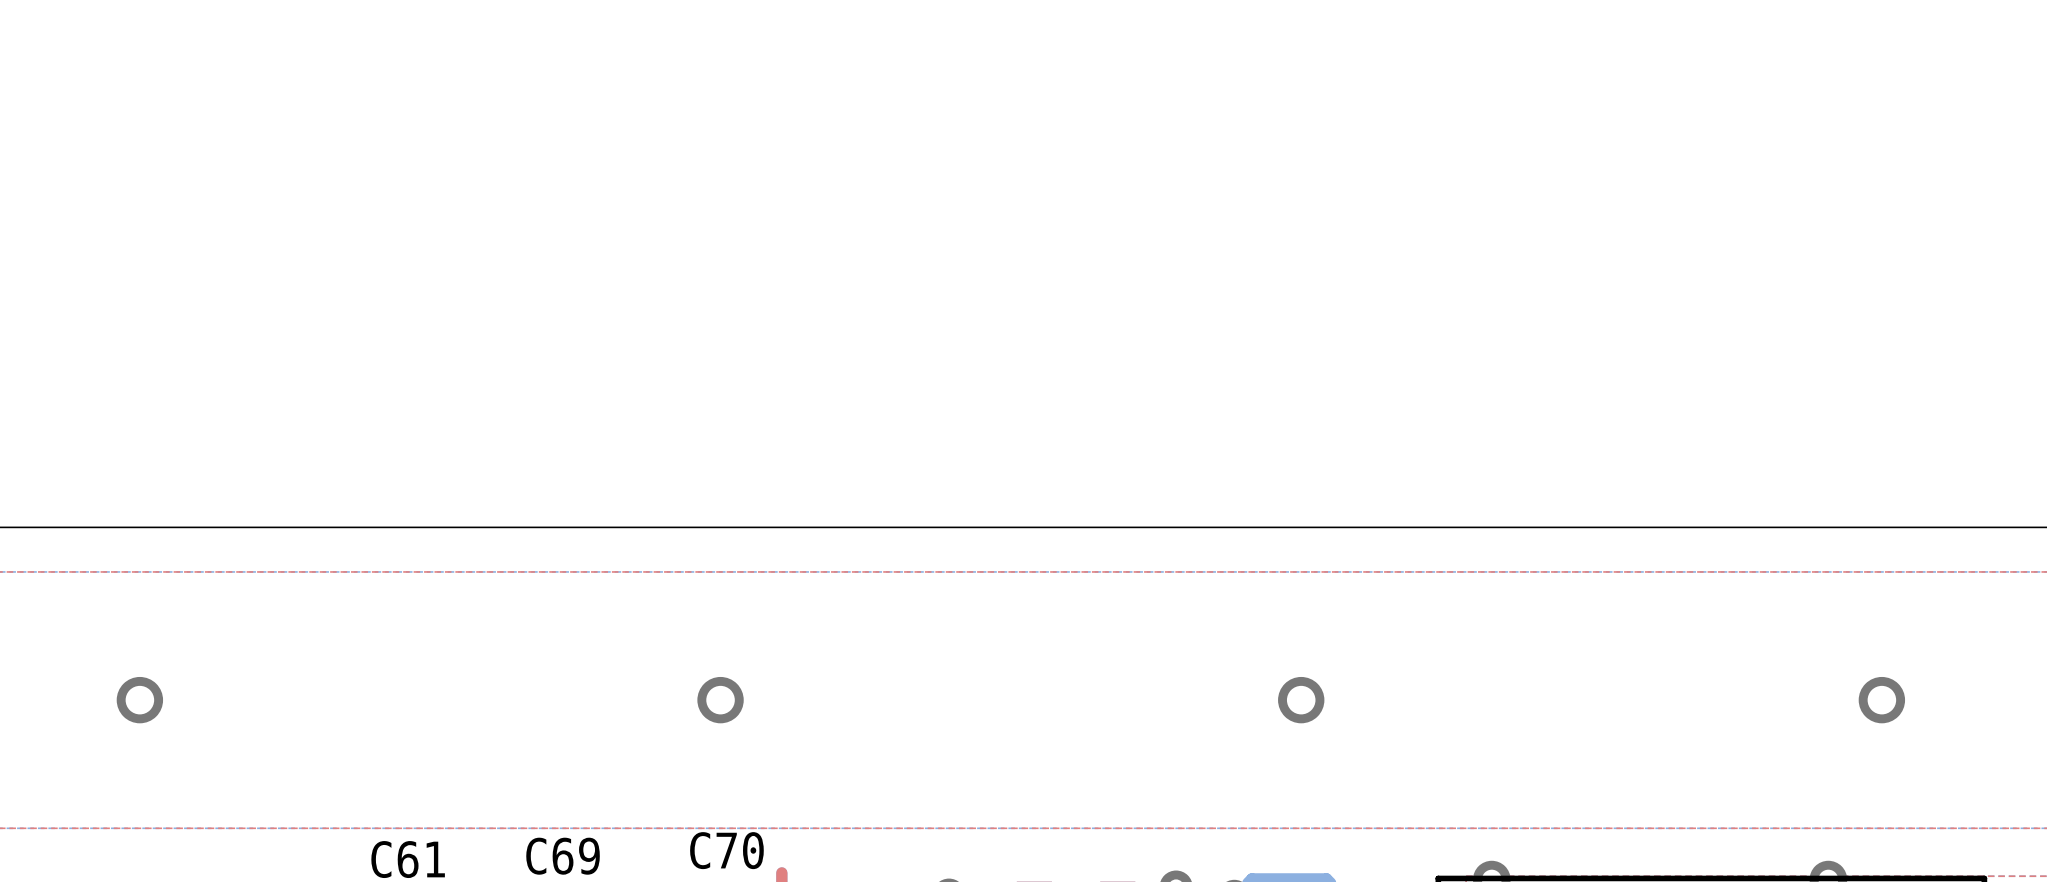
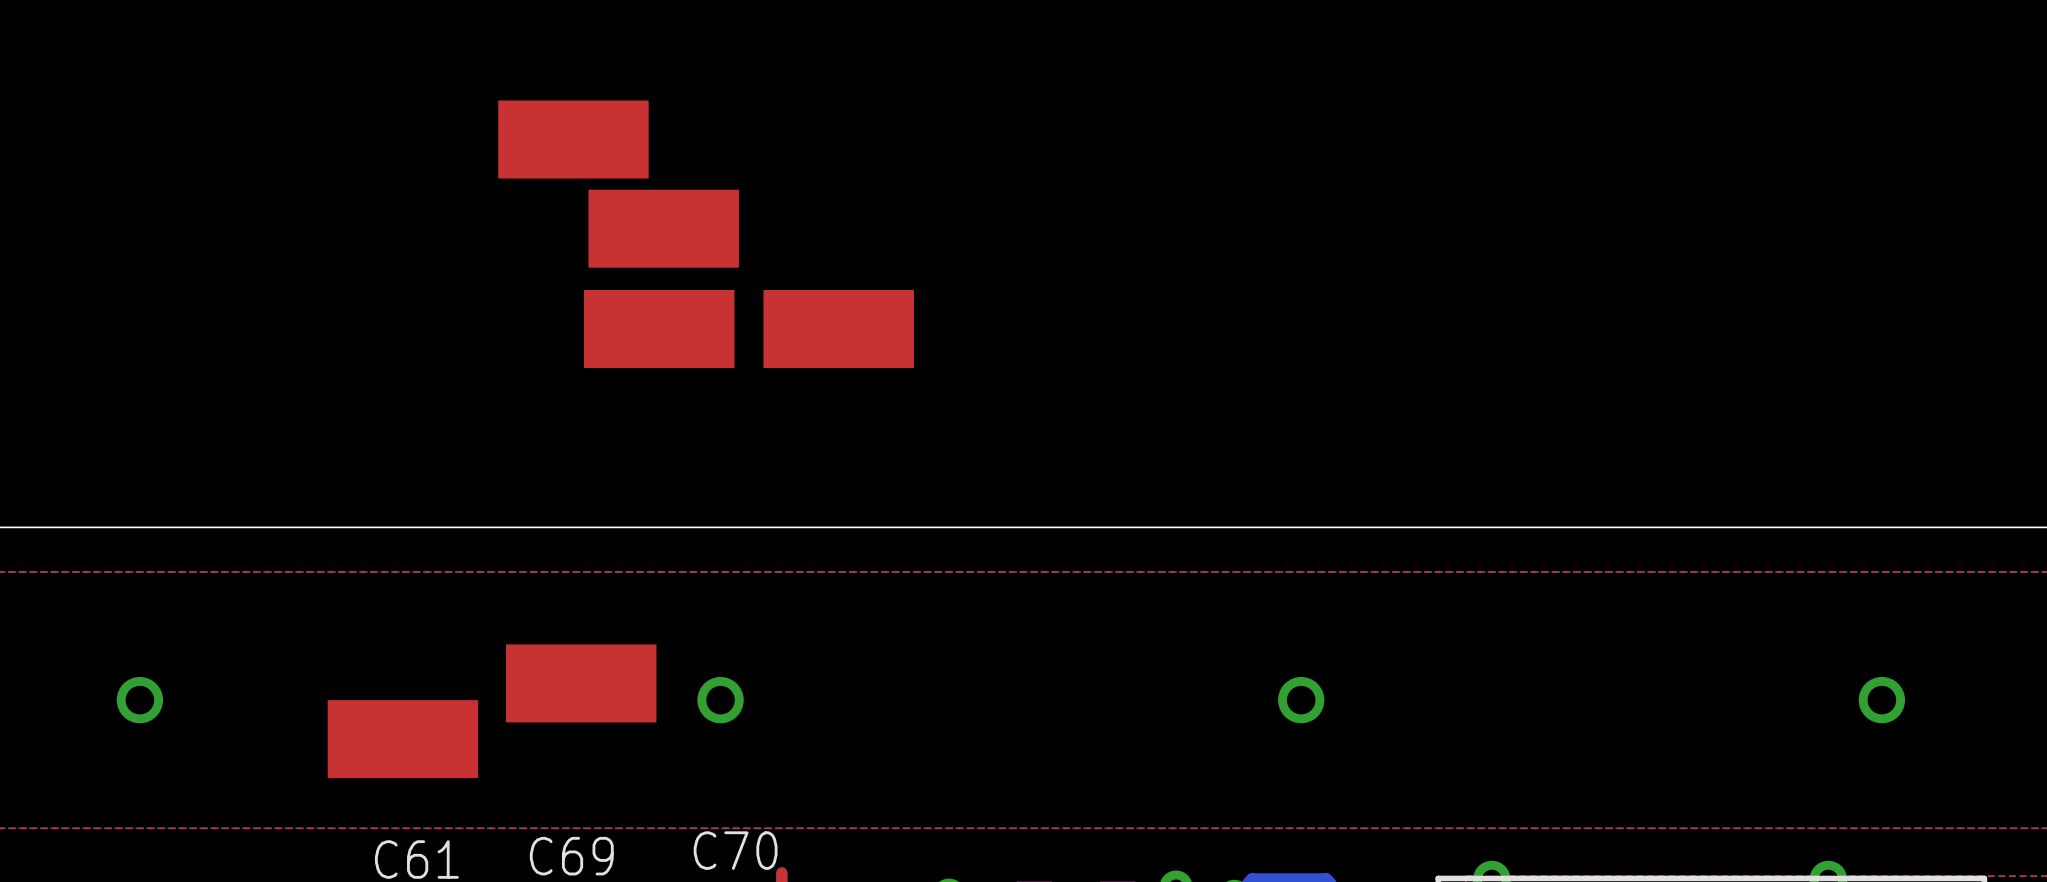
part: none -> (573, 139)
part: none -> (663, 228)
part: none -> (659, 329)
part: none -> (838, 329)
part: none -> (581, 683)
part: none -> (402, 739)

